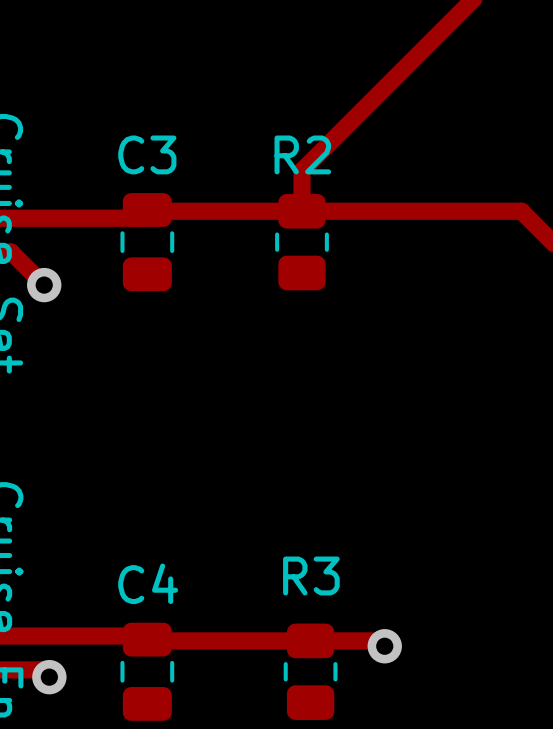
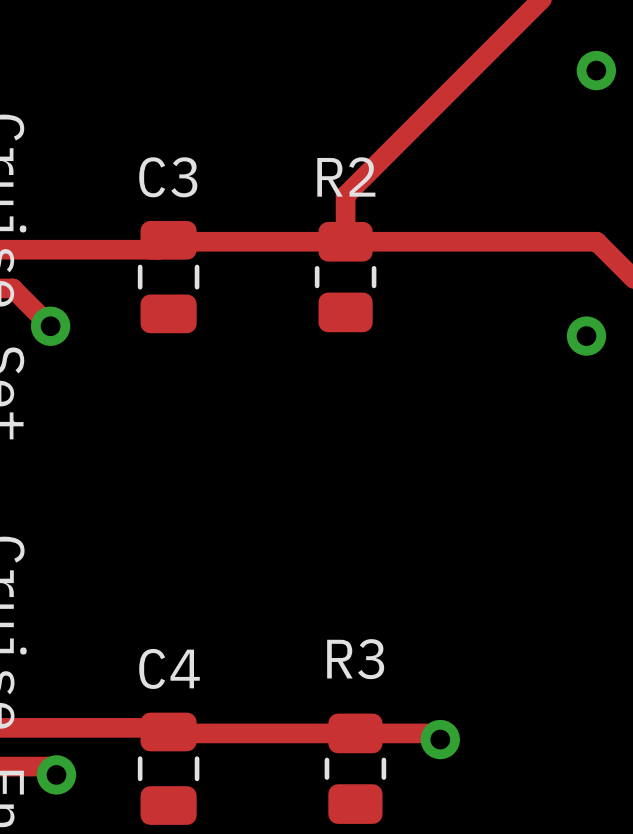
via: none -> (596, 70)
via: none -> (586, 336)

